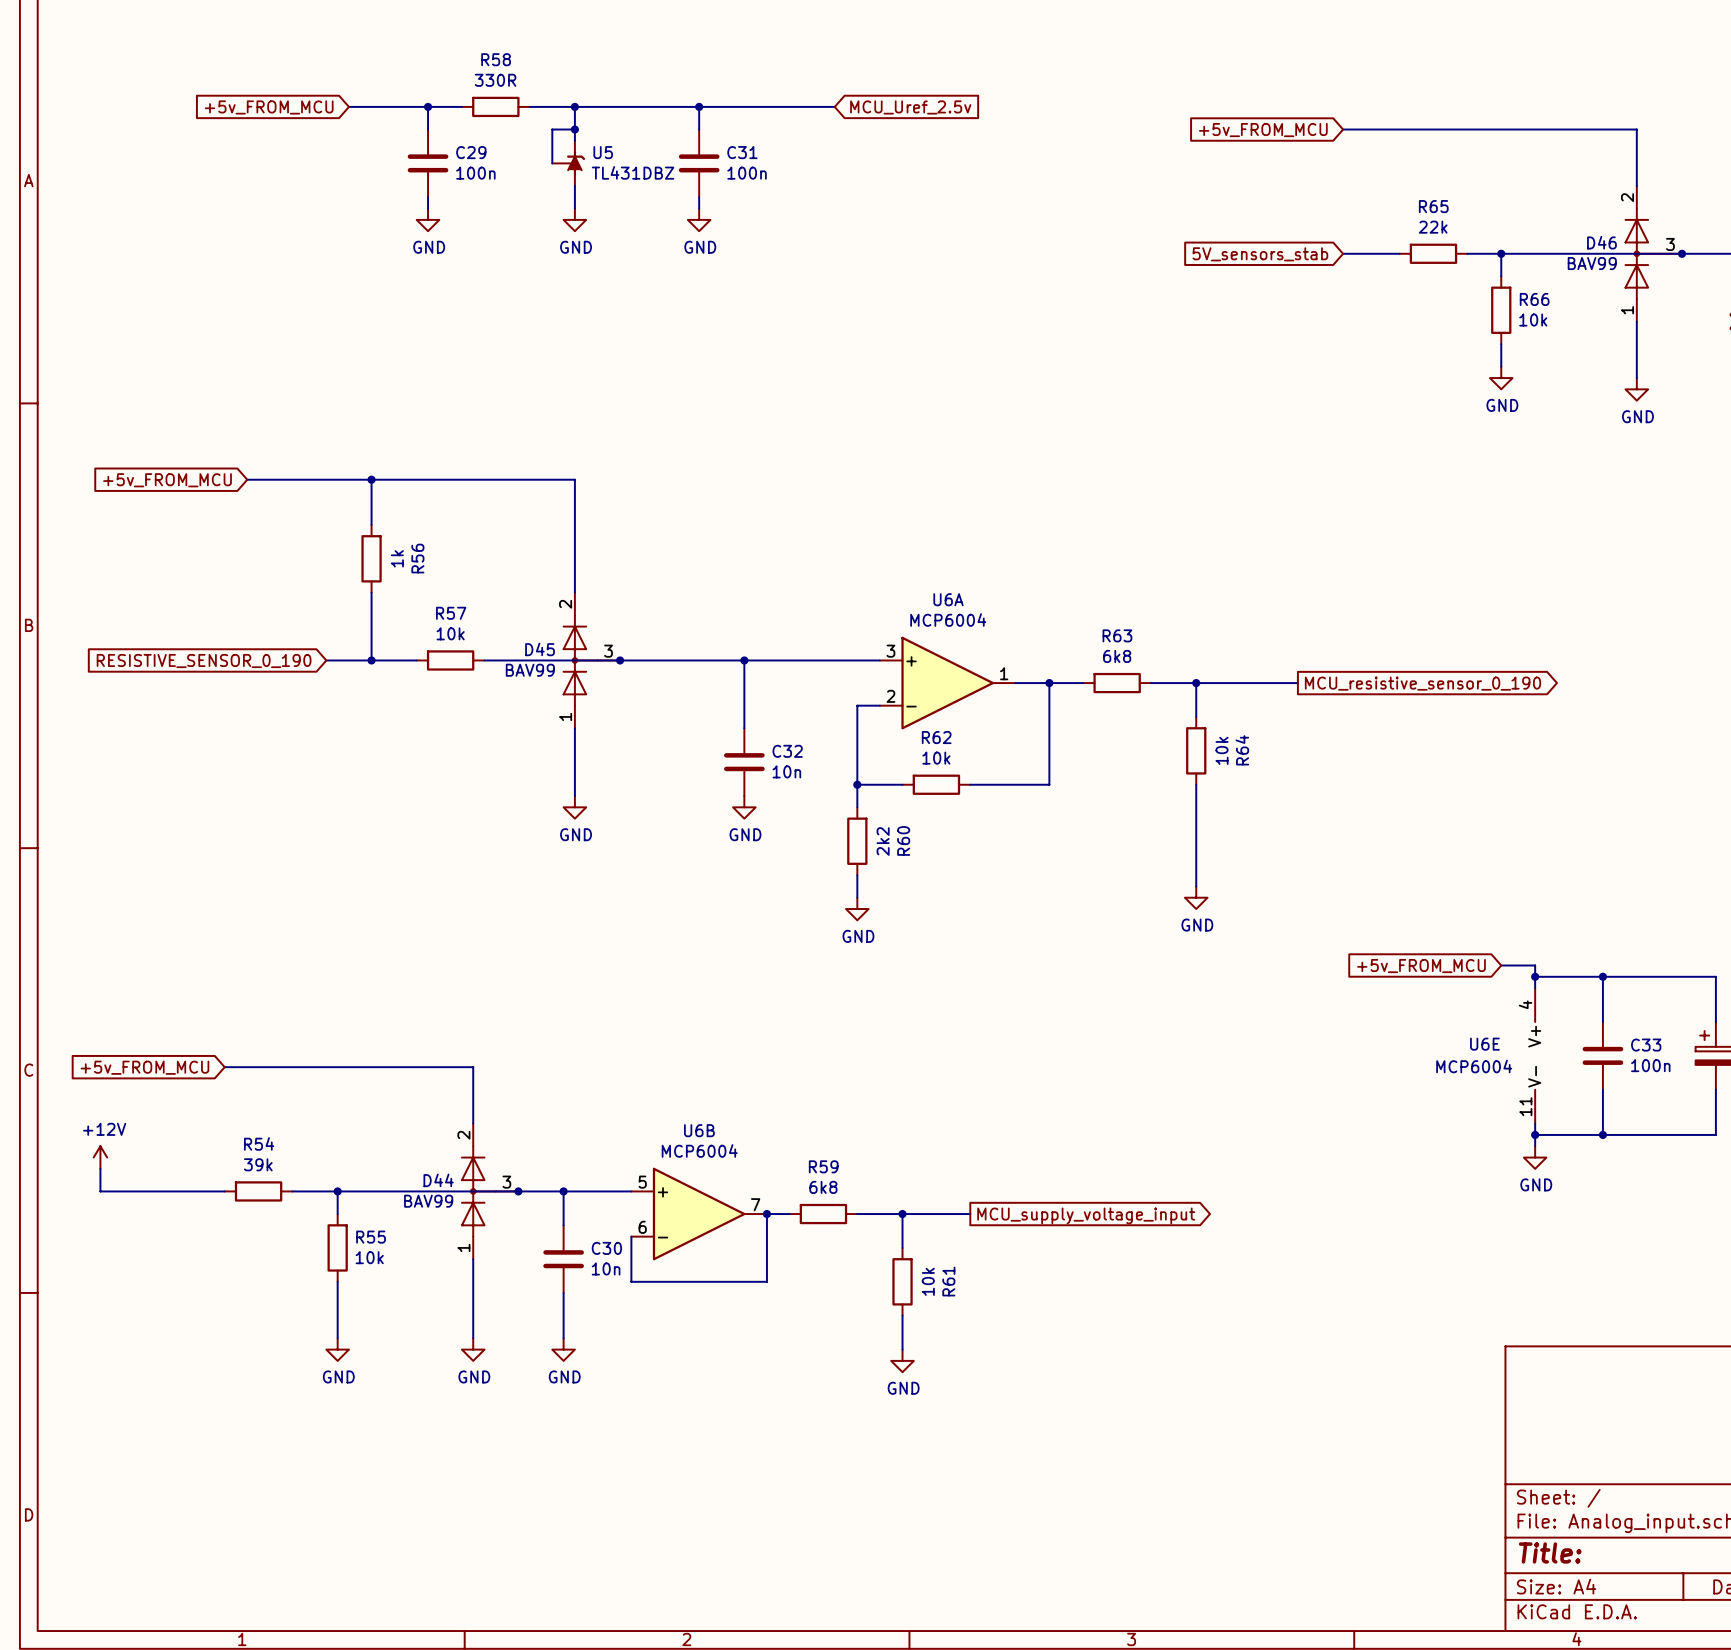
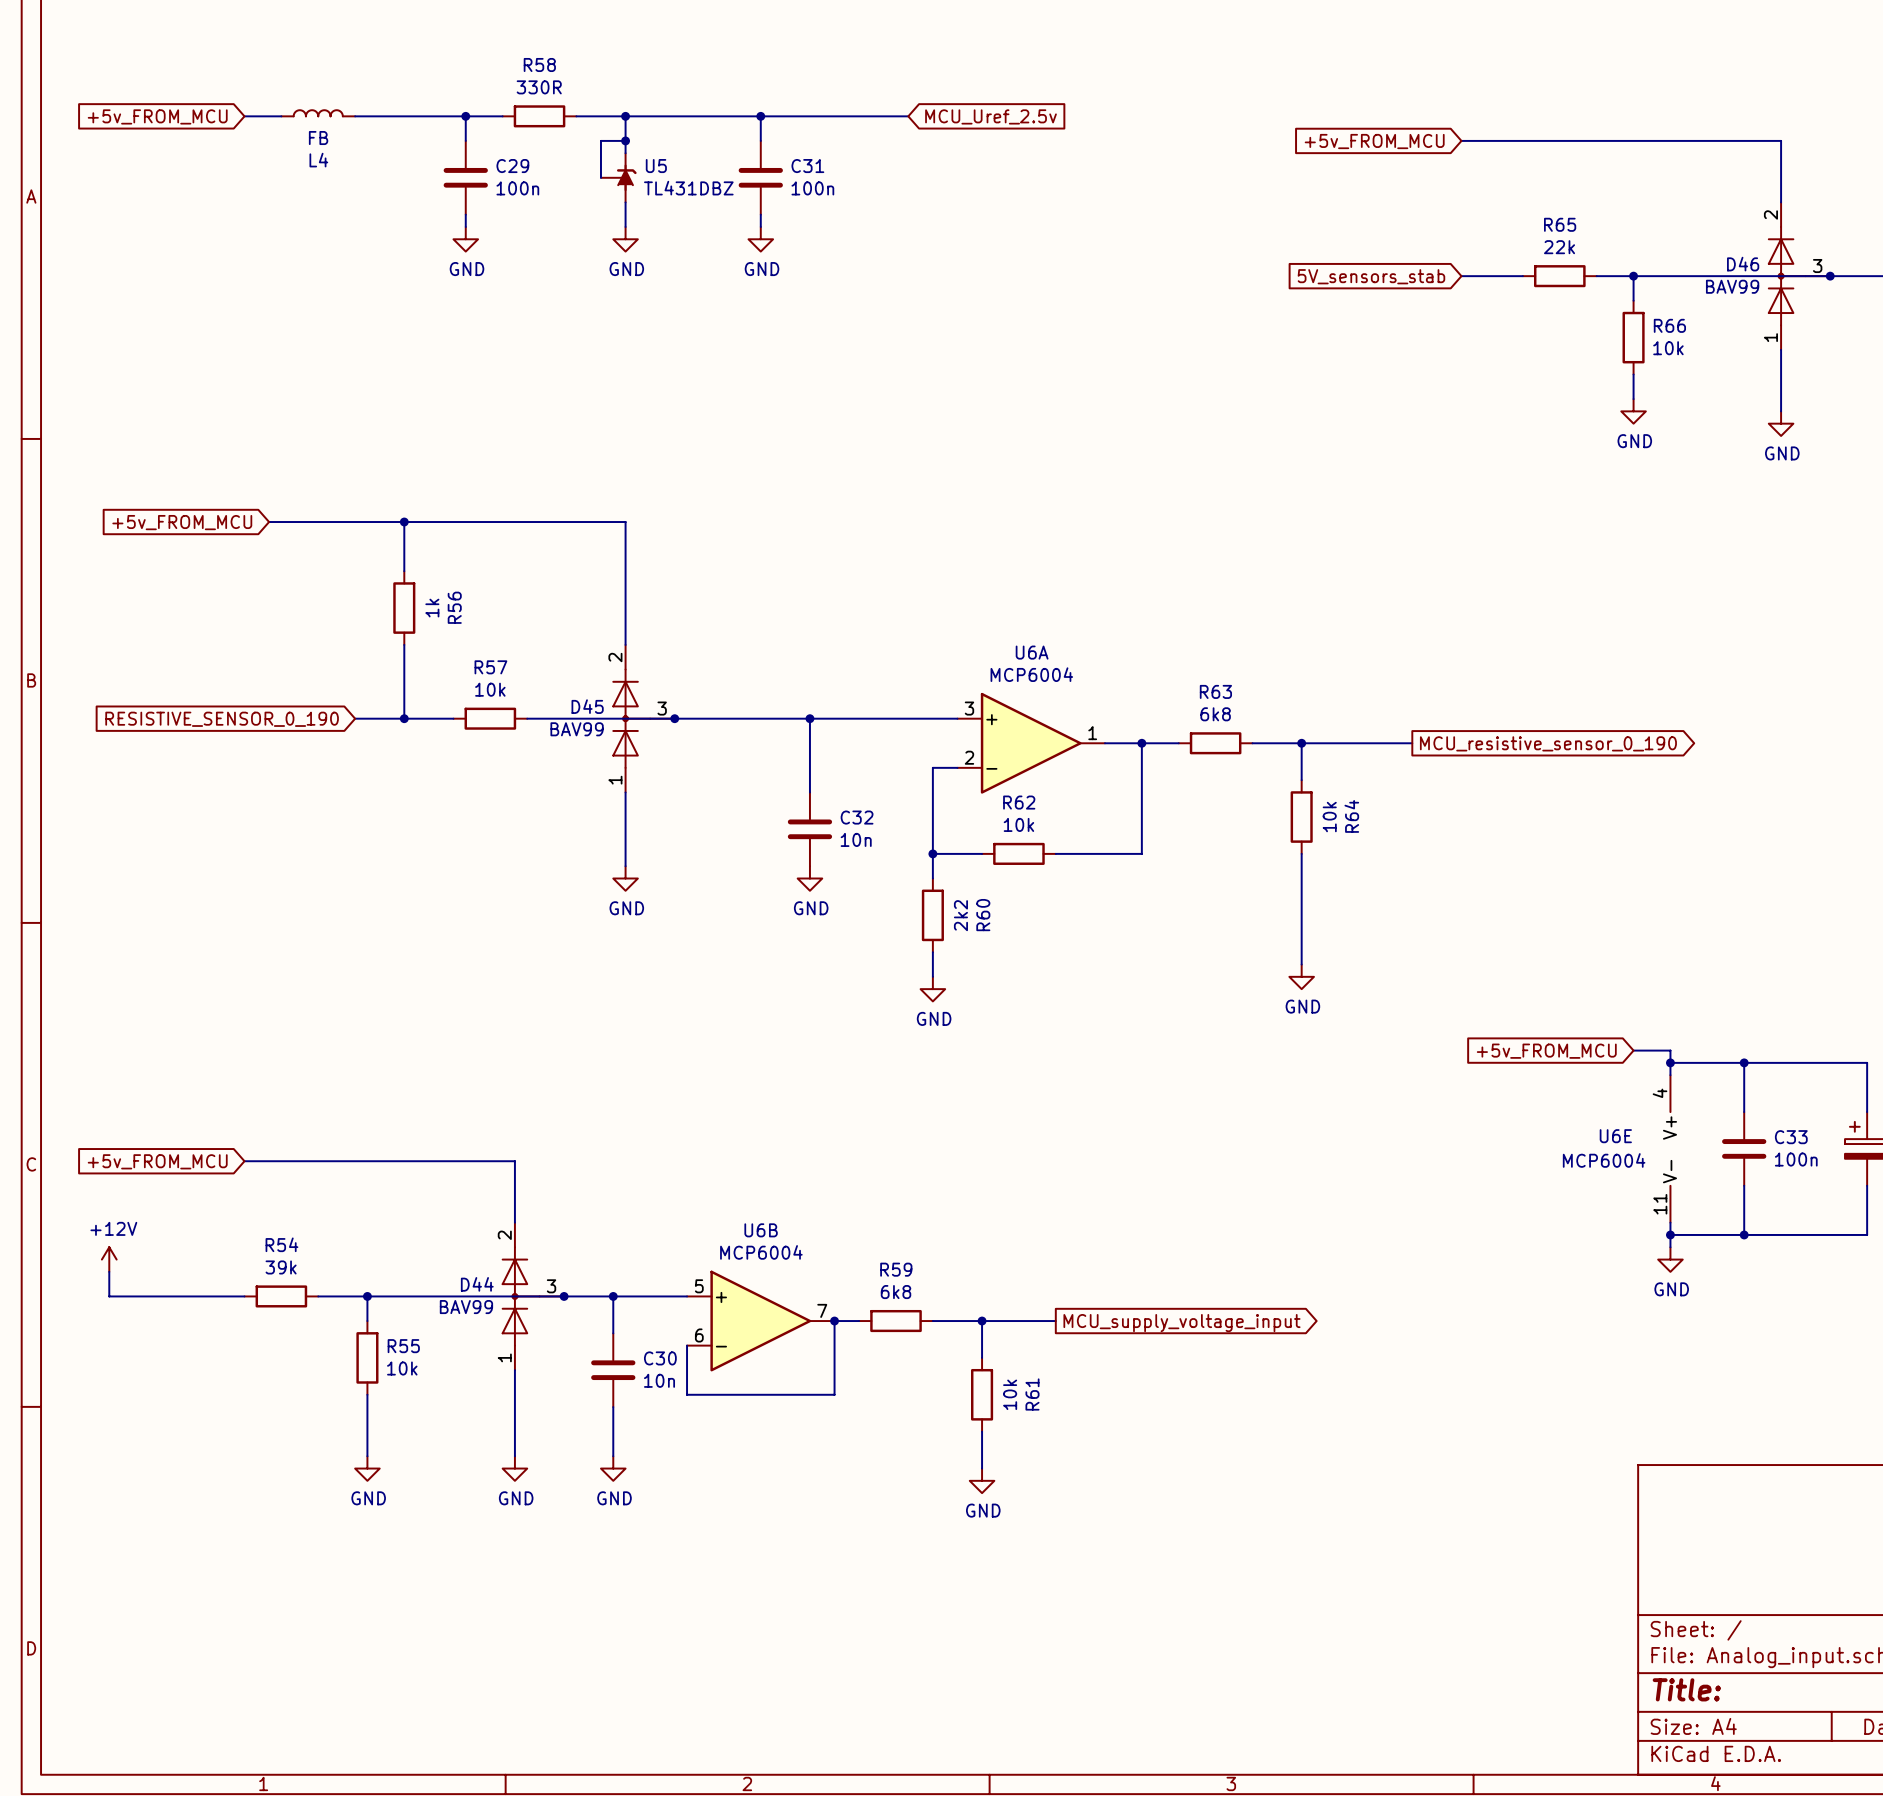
L4: none -> FB (318, 113)
wire: none -> (244, 116) (281, 116)
wire: none -> (355, 116) (379, 116)
global label position: +5v_FROM_MCU (269, 107) -> +5v_FROM_MCU (157, 116)

